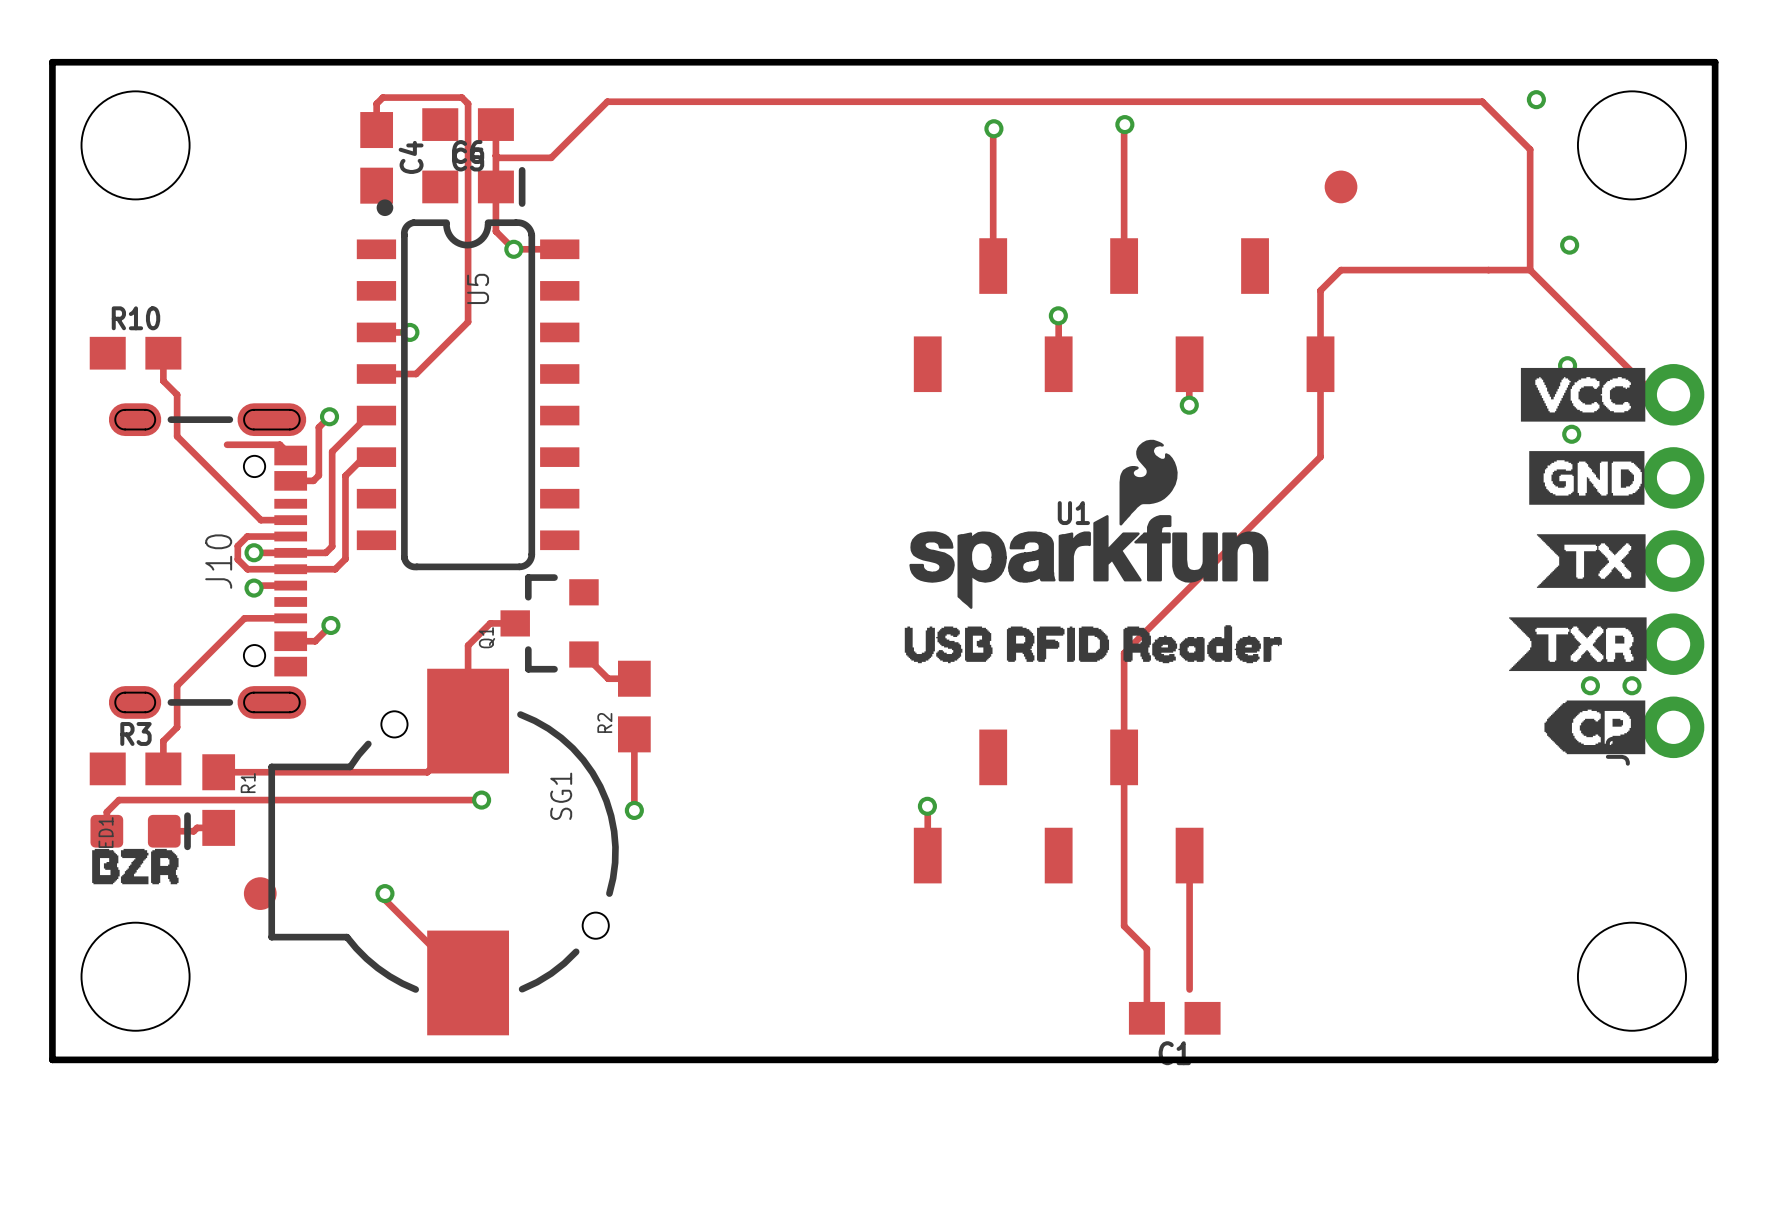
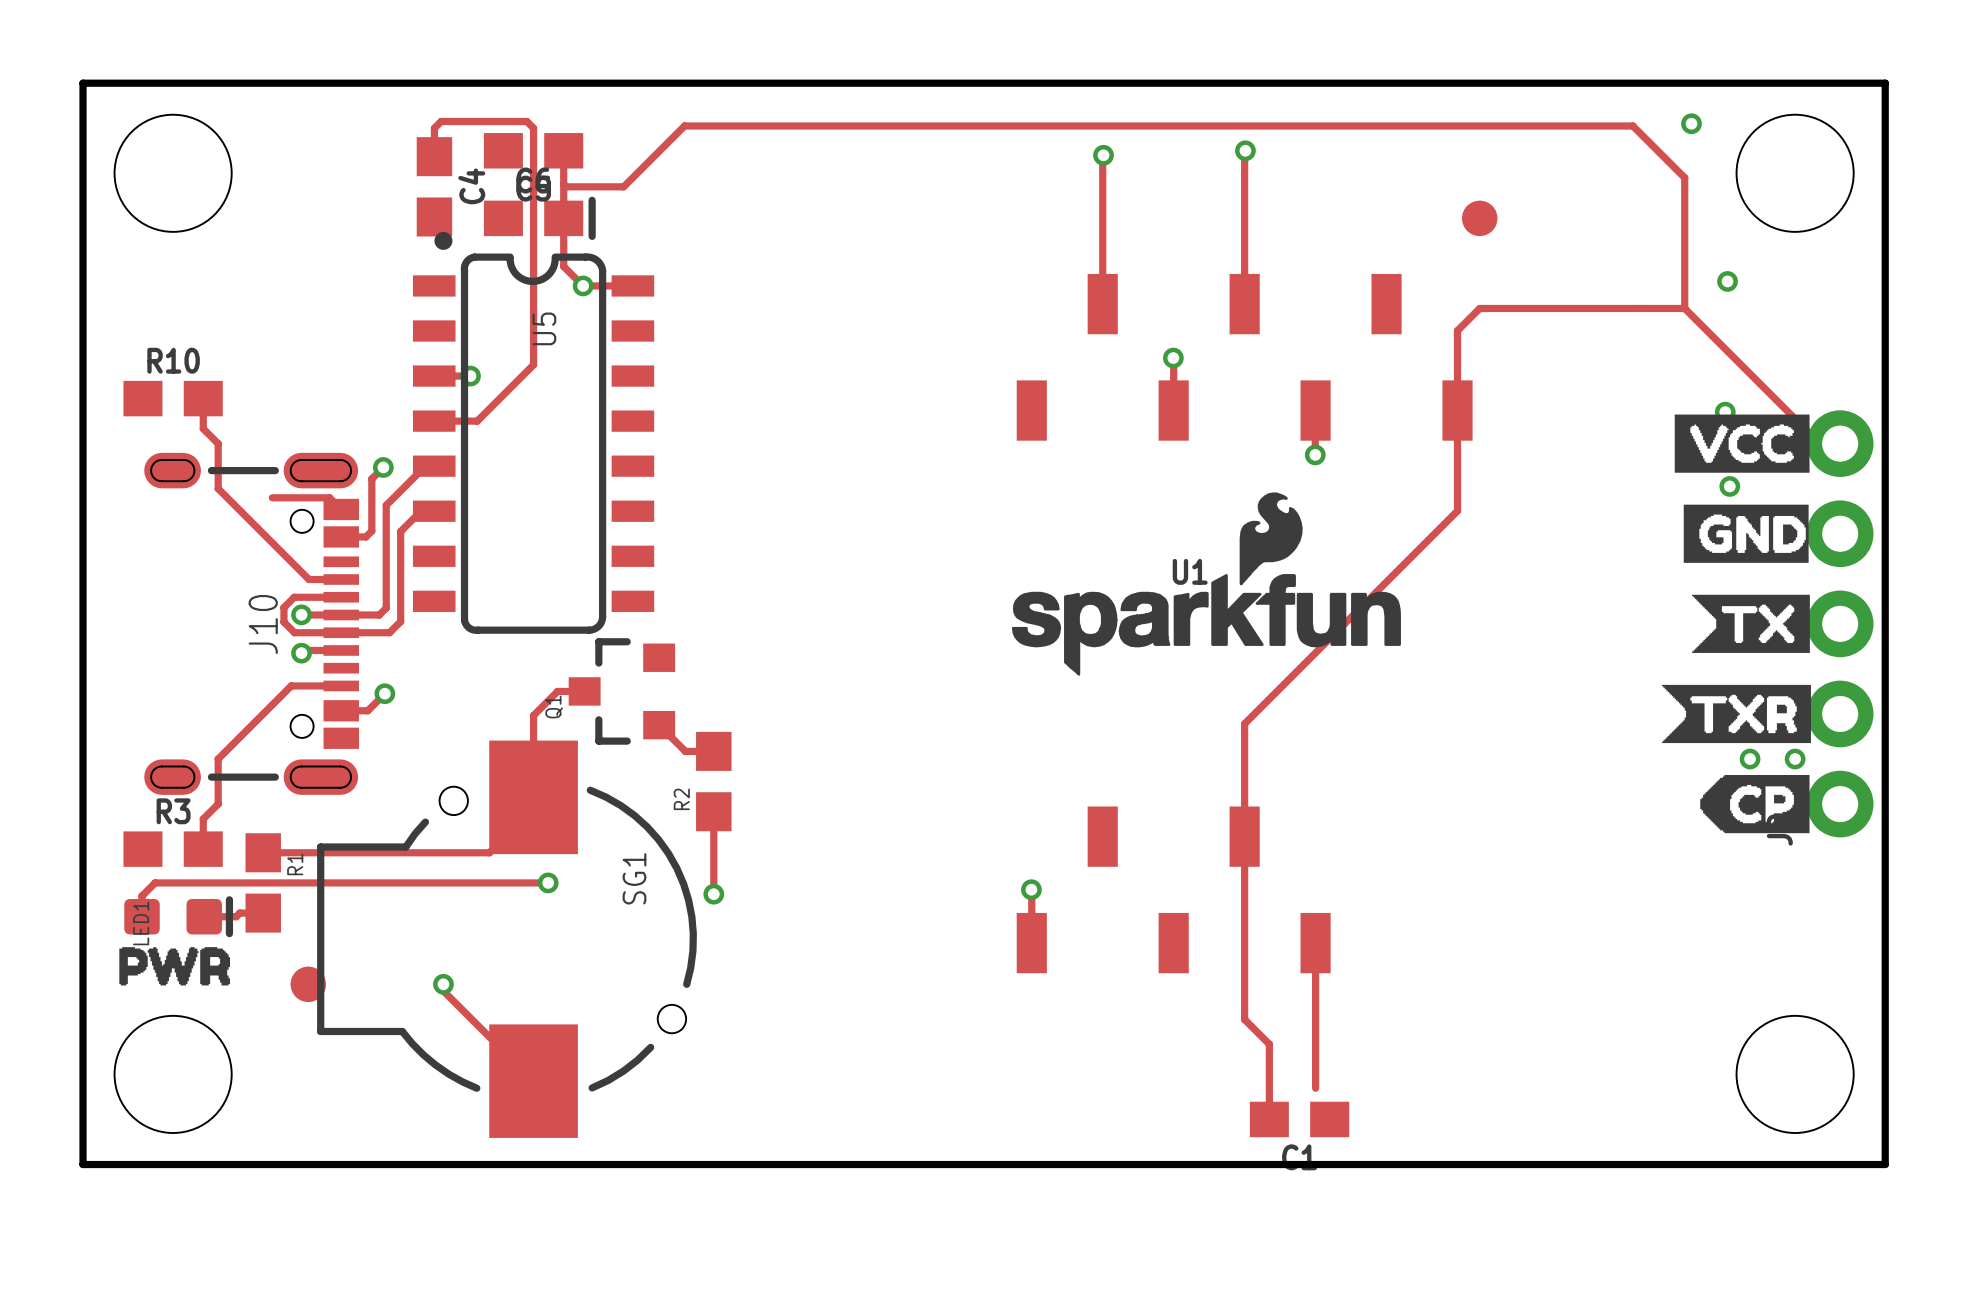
drawing: [904, 625, 1282, 664] -> none
drawing shape: [92, 848, 179, 885] -> [119, 947, 231, 986]

